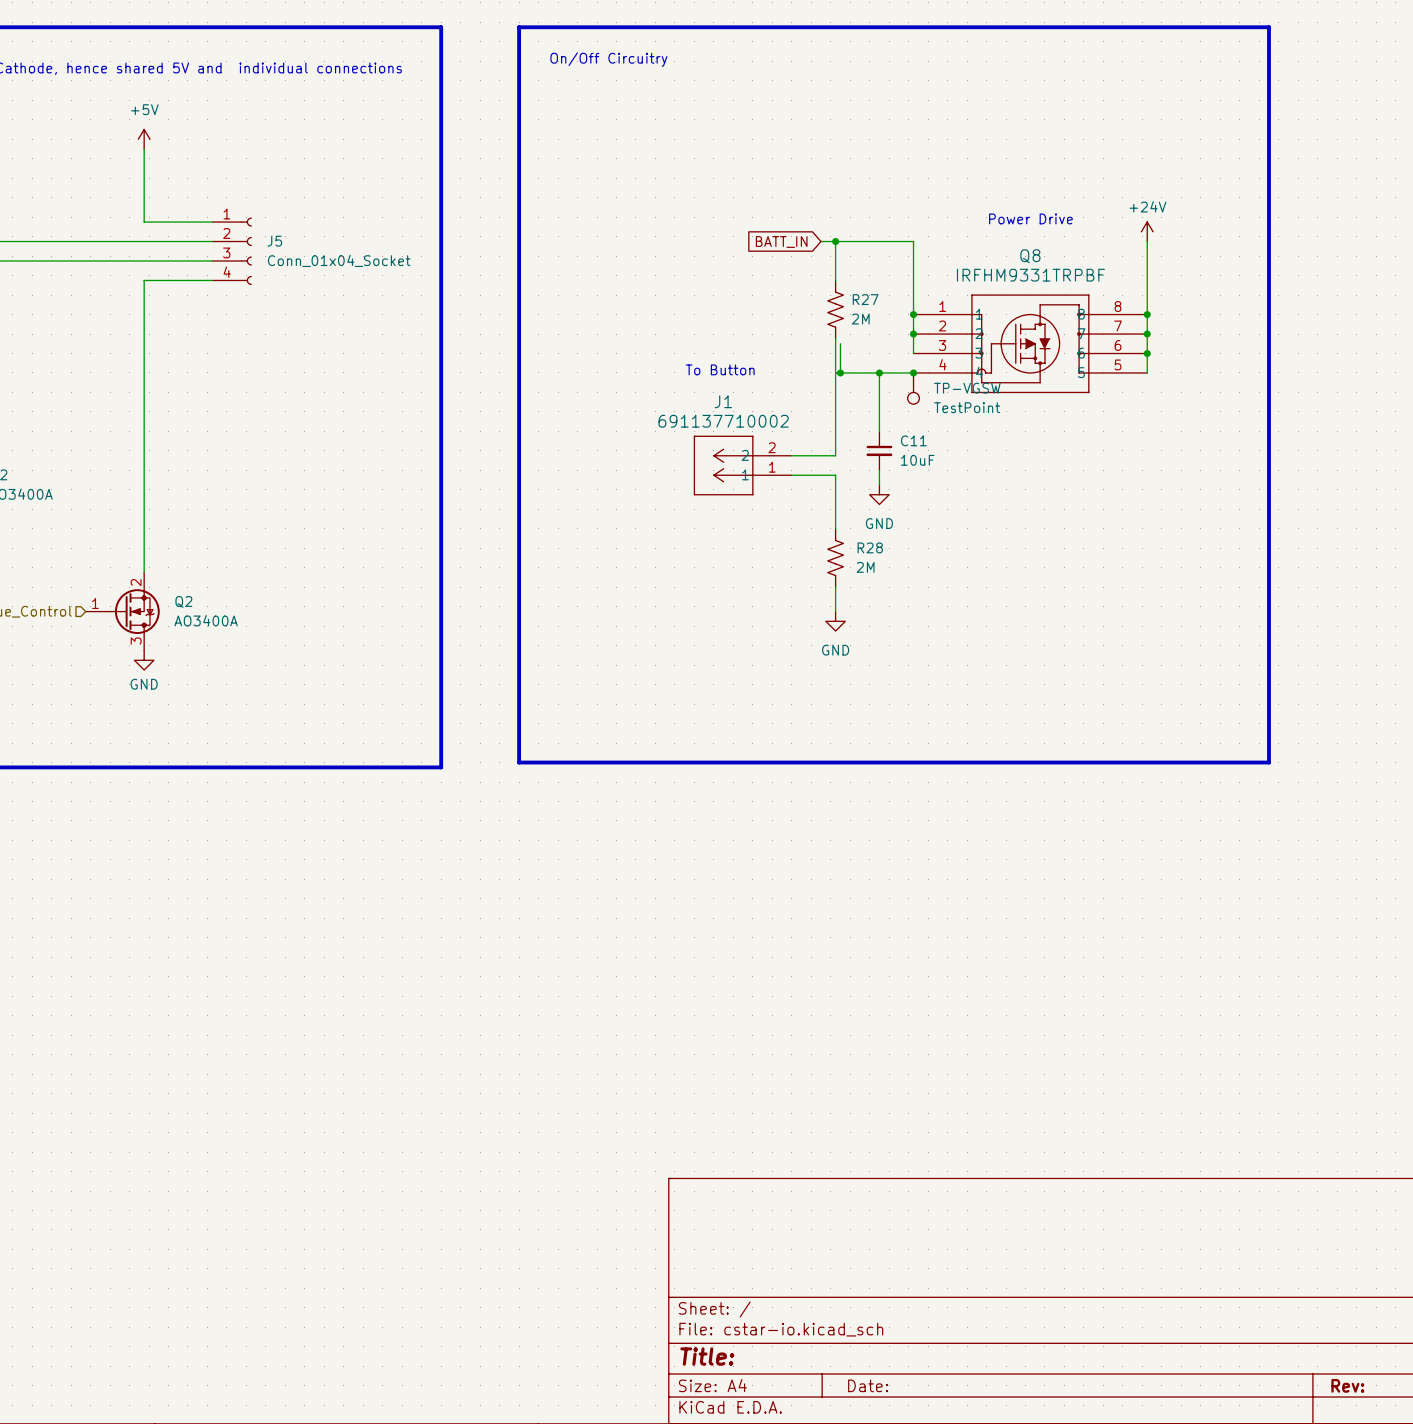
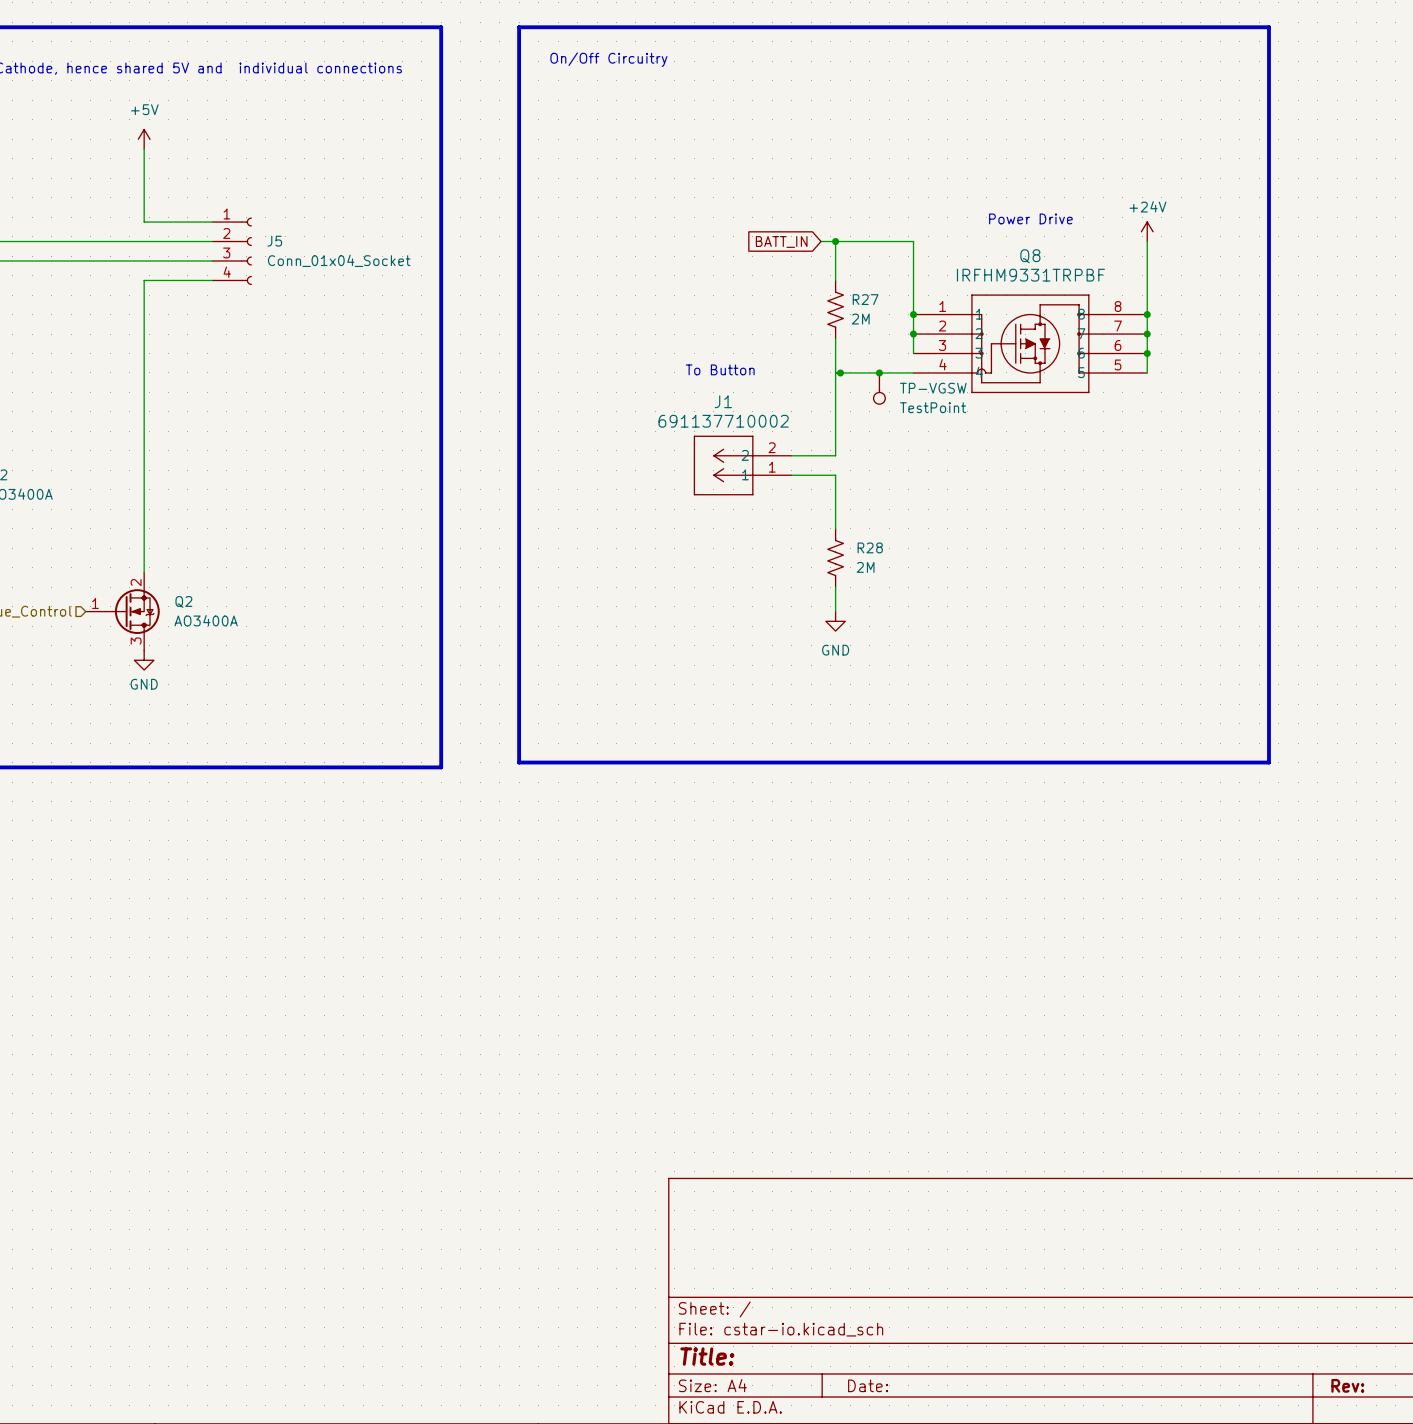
wire: (840, 343) (840, 372) -> none
wire: (879, 372) (879, 431) -> none
junction: (913, 372) -> none
TP-VGSW position: (913, 388) -> (879, 388)
C11: 10uF (879, 450) -> none
wire: (879, 470) (879, 484) -> none
power symbol: GND (879, 494) -> none

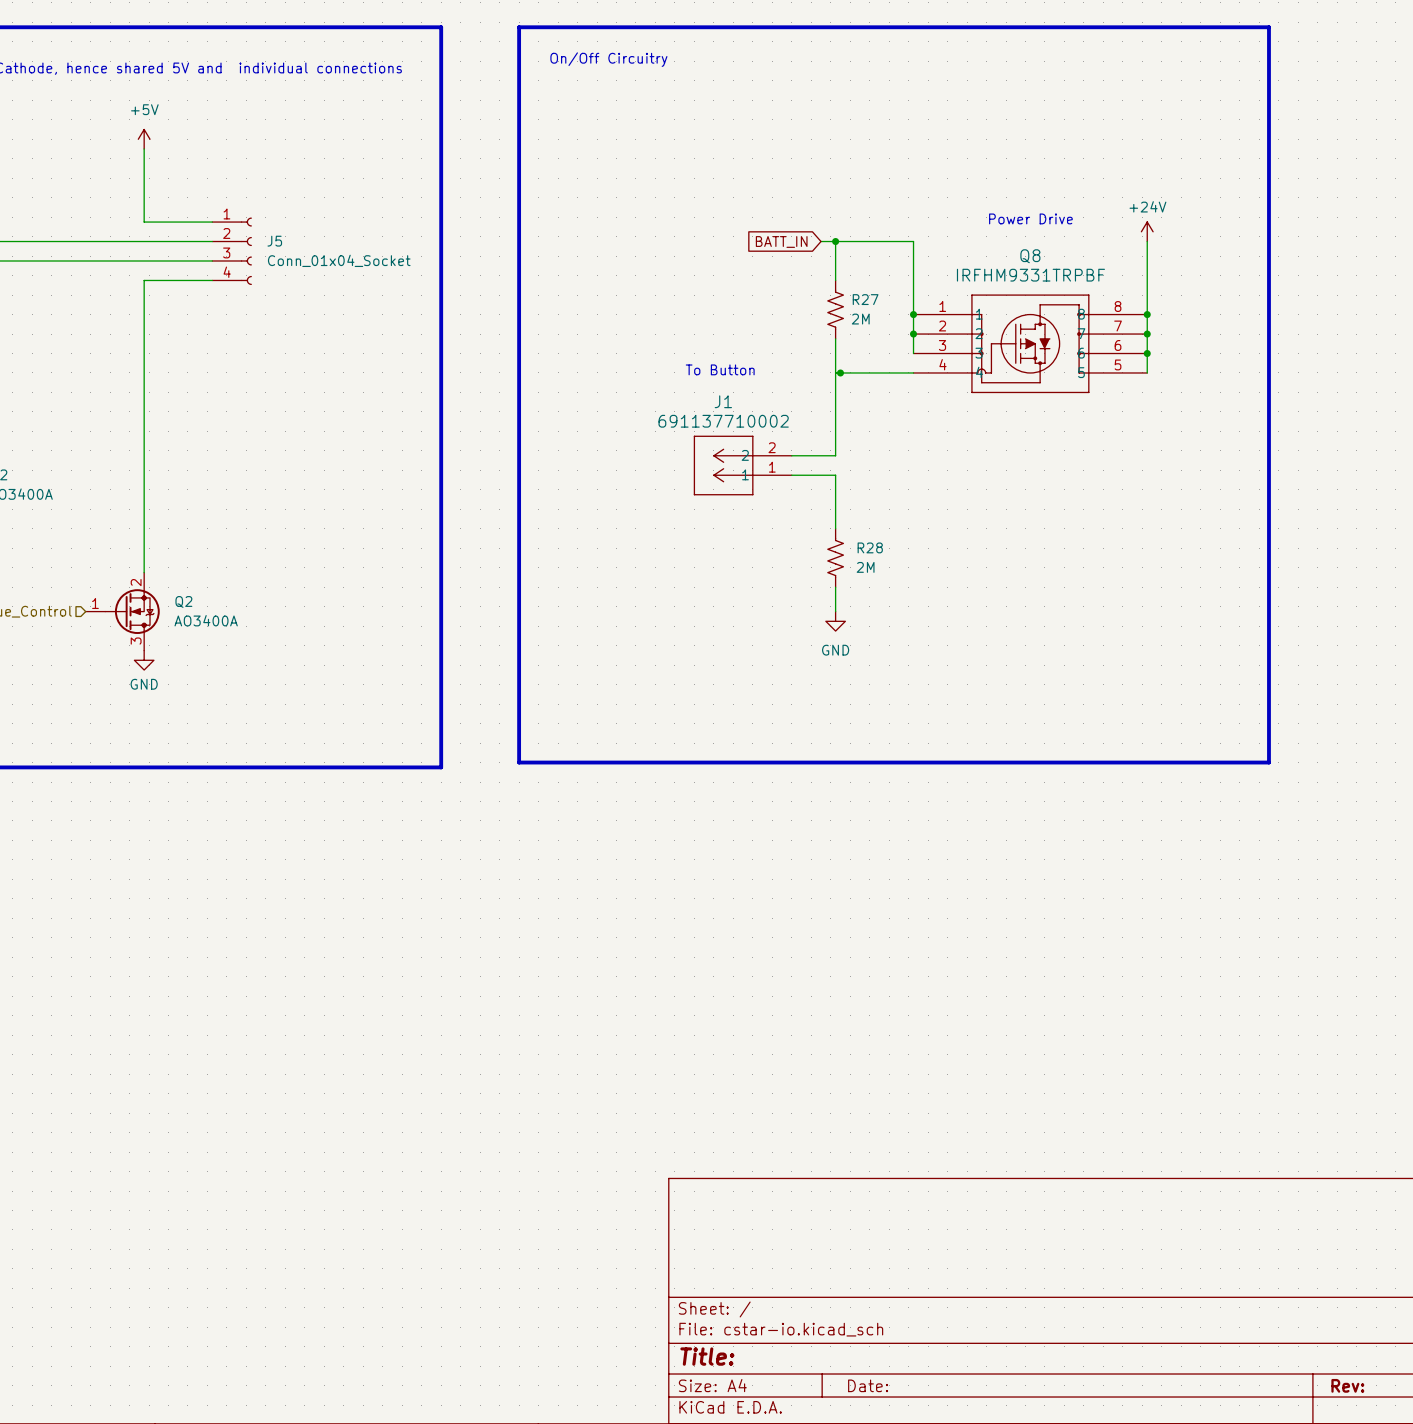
junction: (879, 372) -> none
TP-VGSW: TestPoint (879, 388) -> none

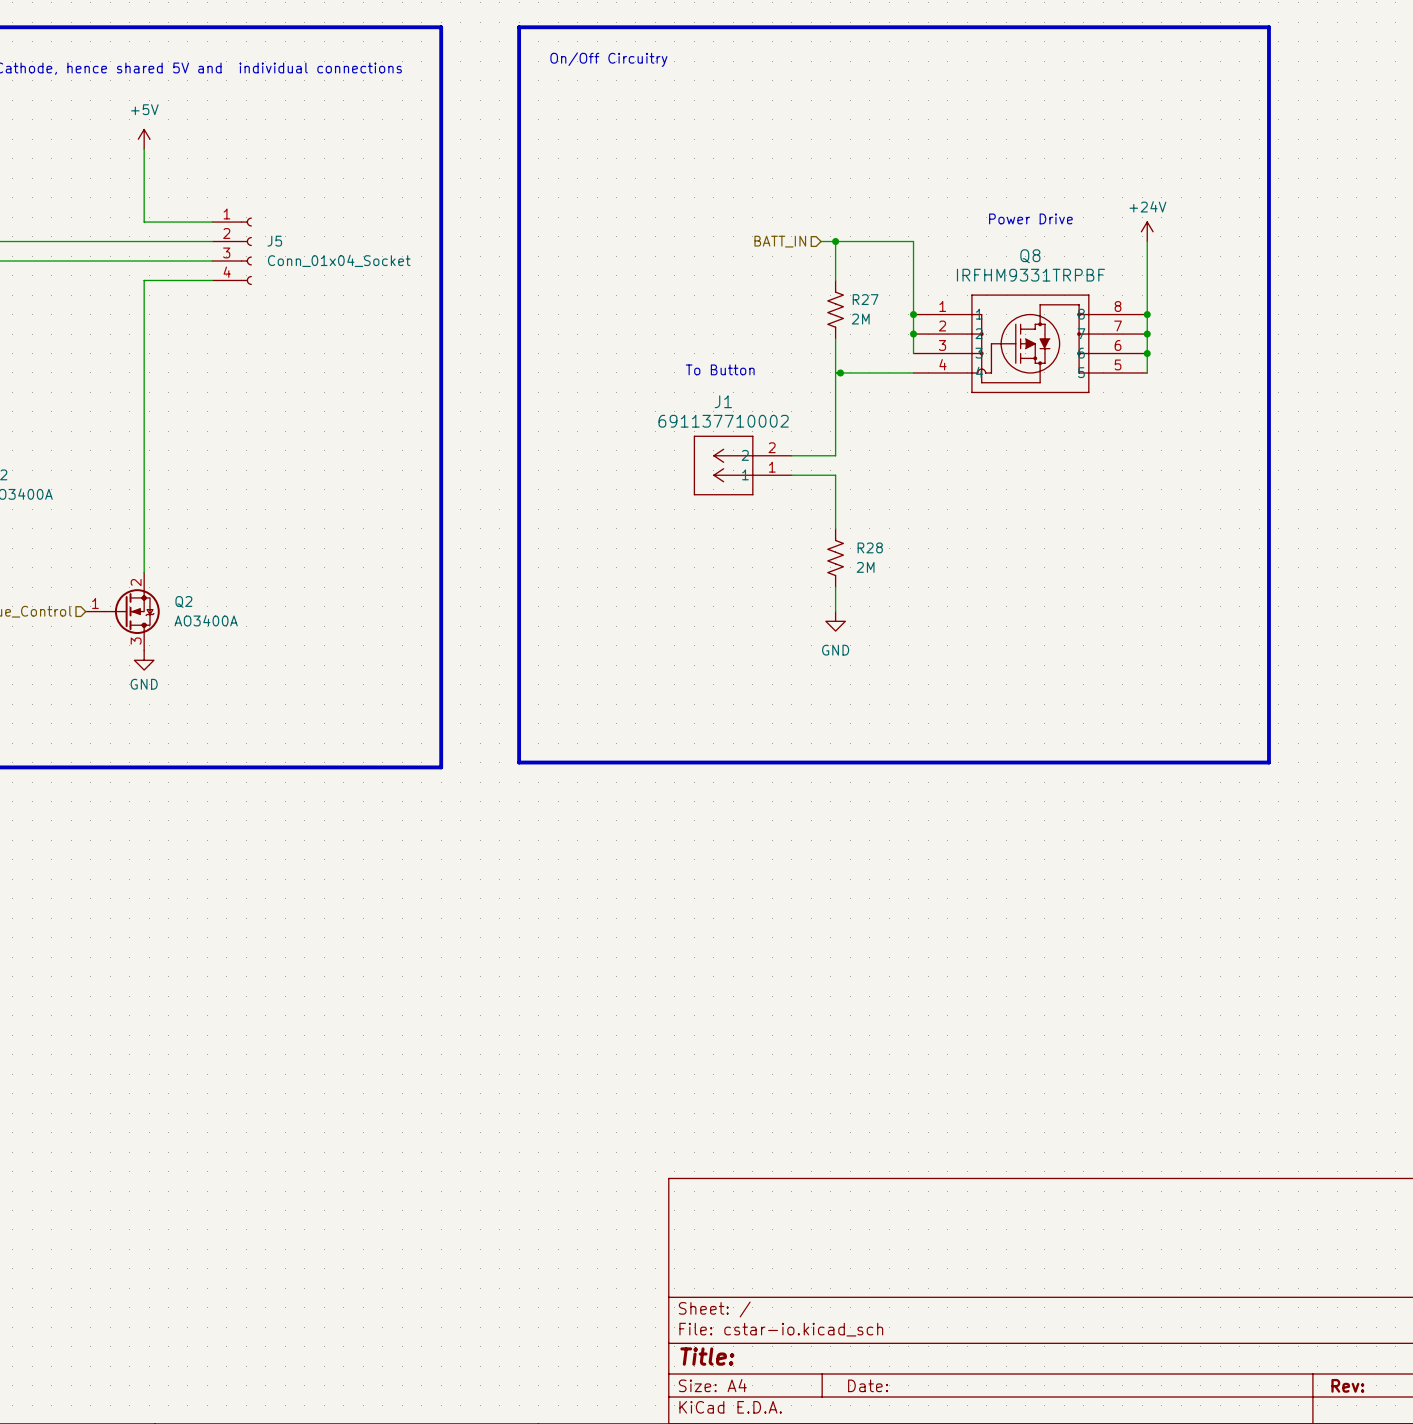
hierarchical label: none -> BATT_IN (780, 241)
global label: BATT_IN (781, 241) -> none

